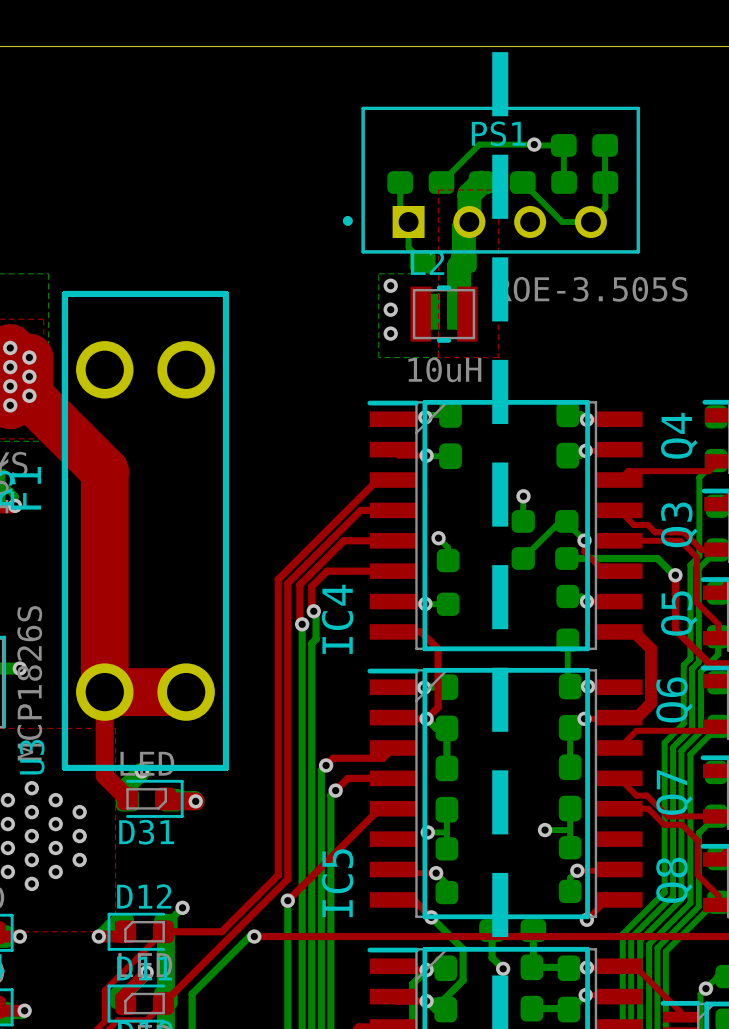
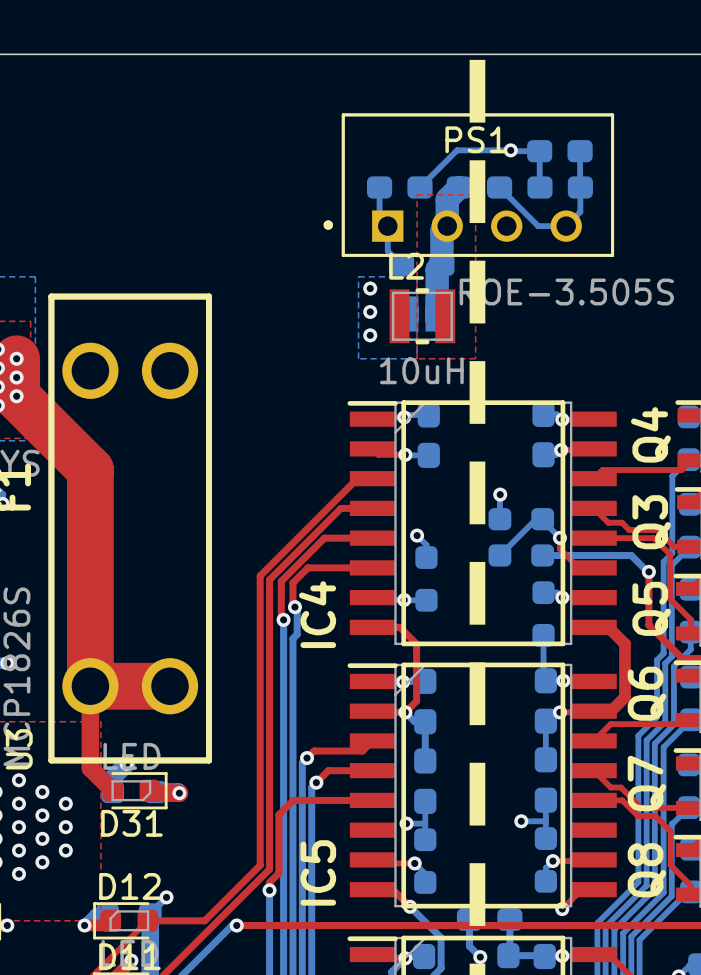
top track: (379, 808) (287, 900) -> (359, 800) (293, 800) (278, 814) (278, 873) (269, 882) (269, 890)

